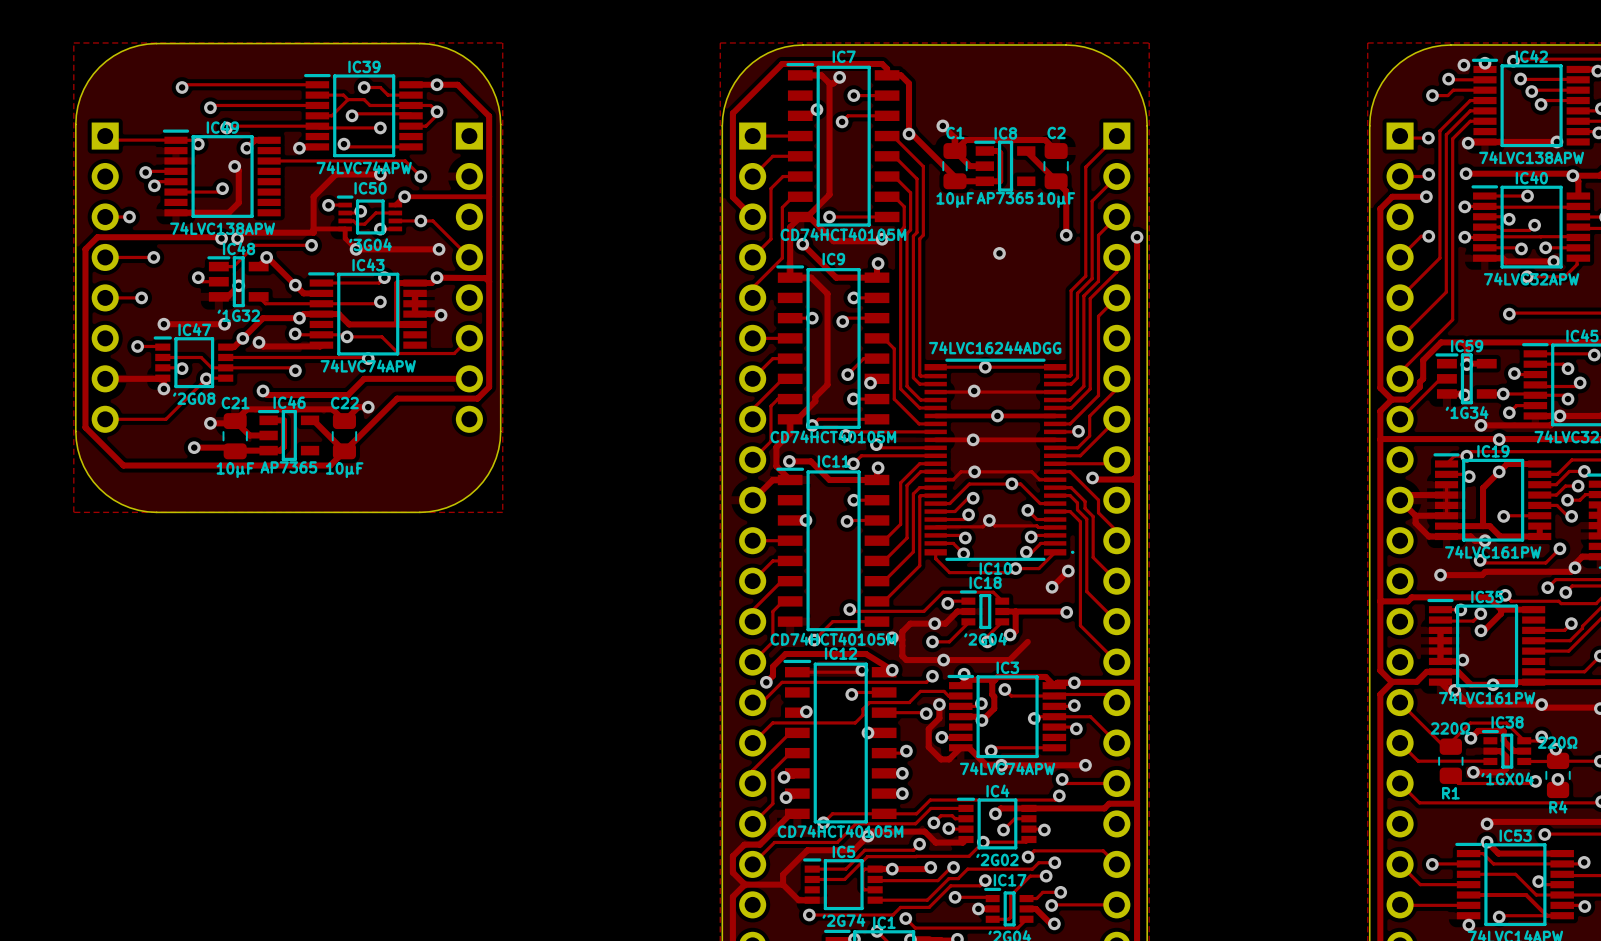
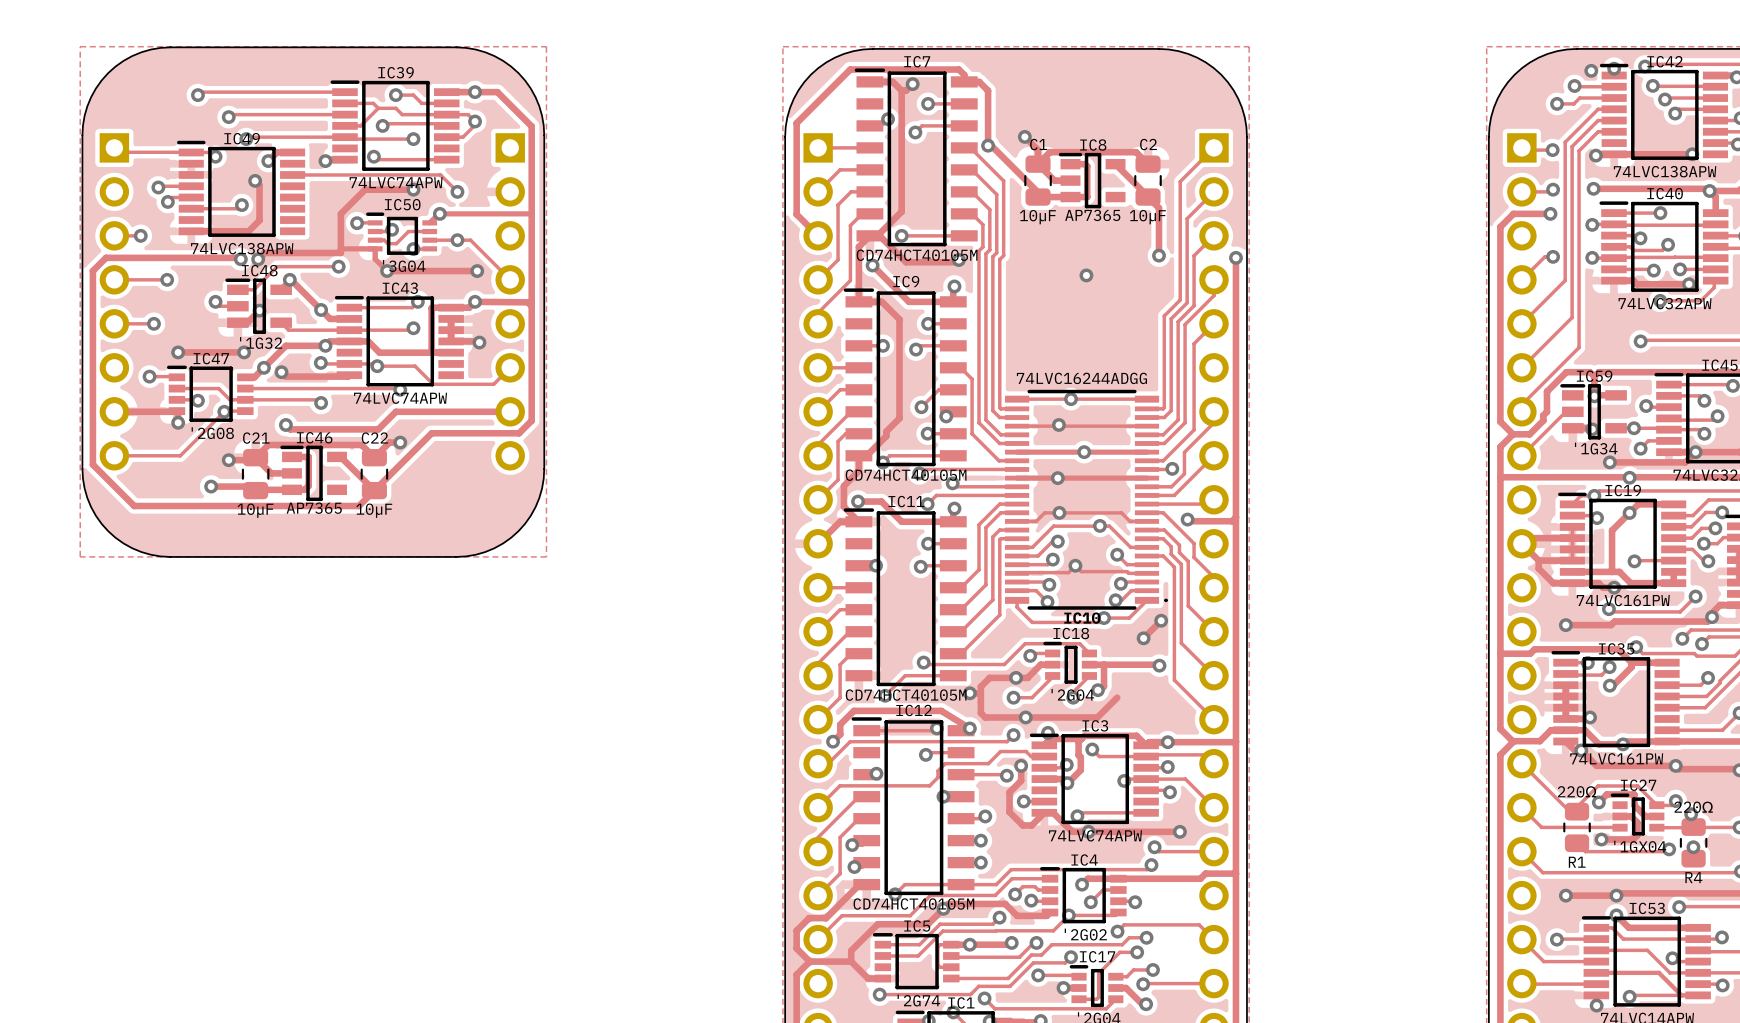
IC38 name: IC38 (1507, 722) -> IC27 (1638, 785)
track: none -> (1565, 895) (1616, 895)
via: none -> (1565, 895)

